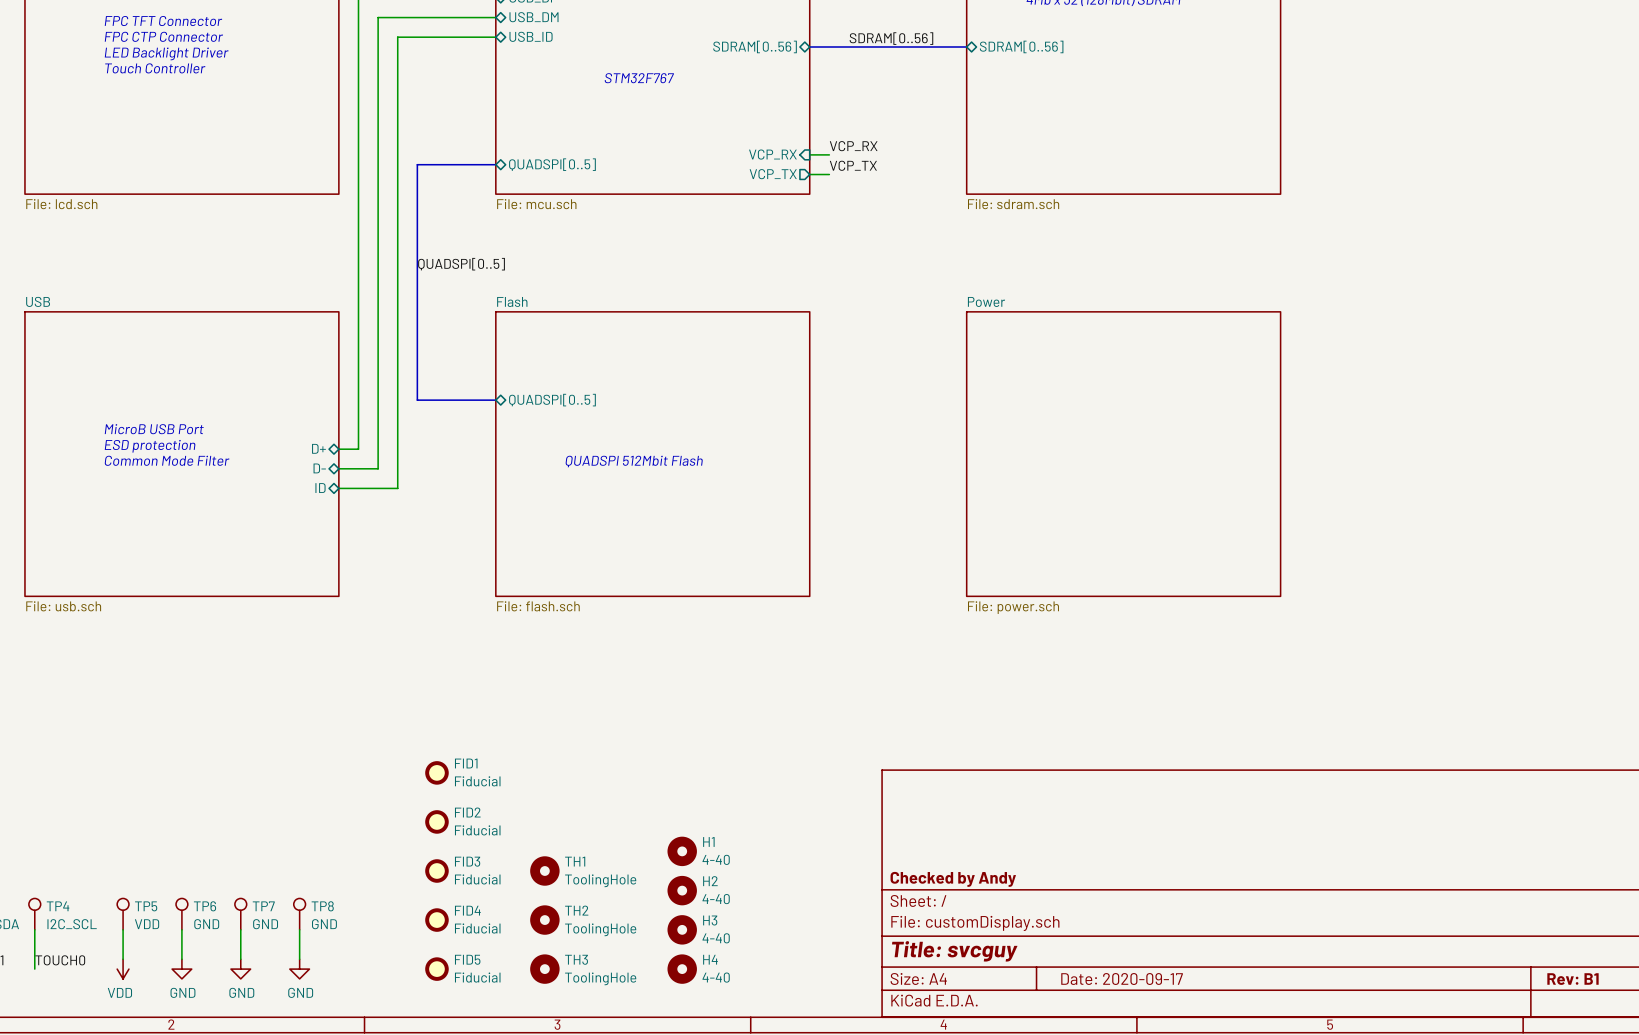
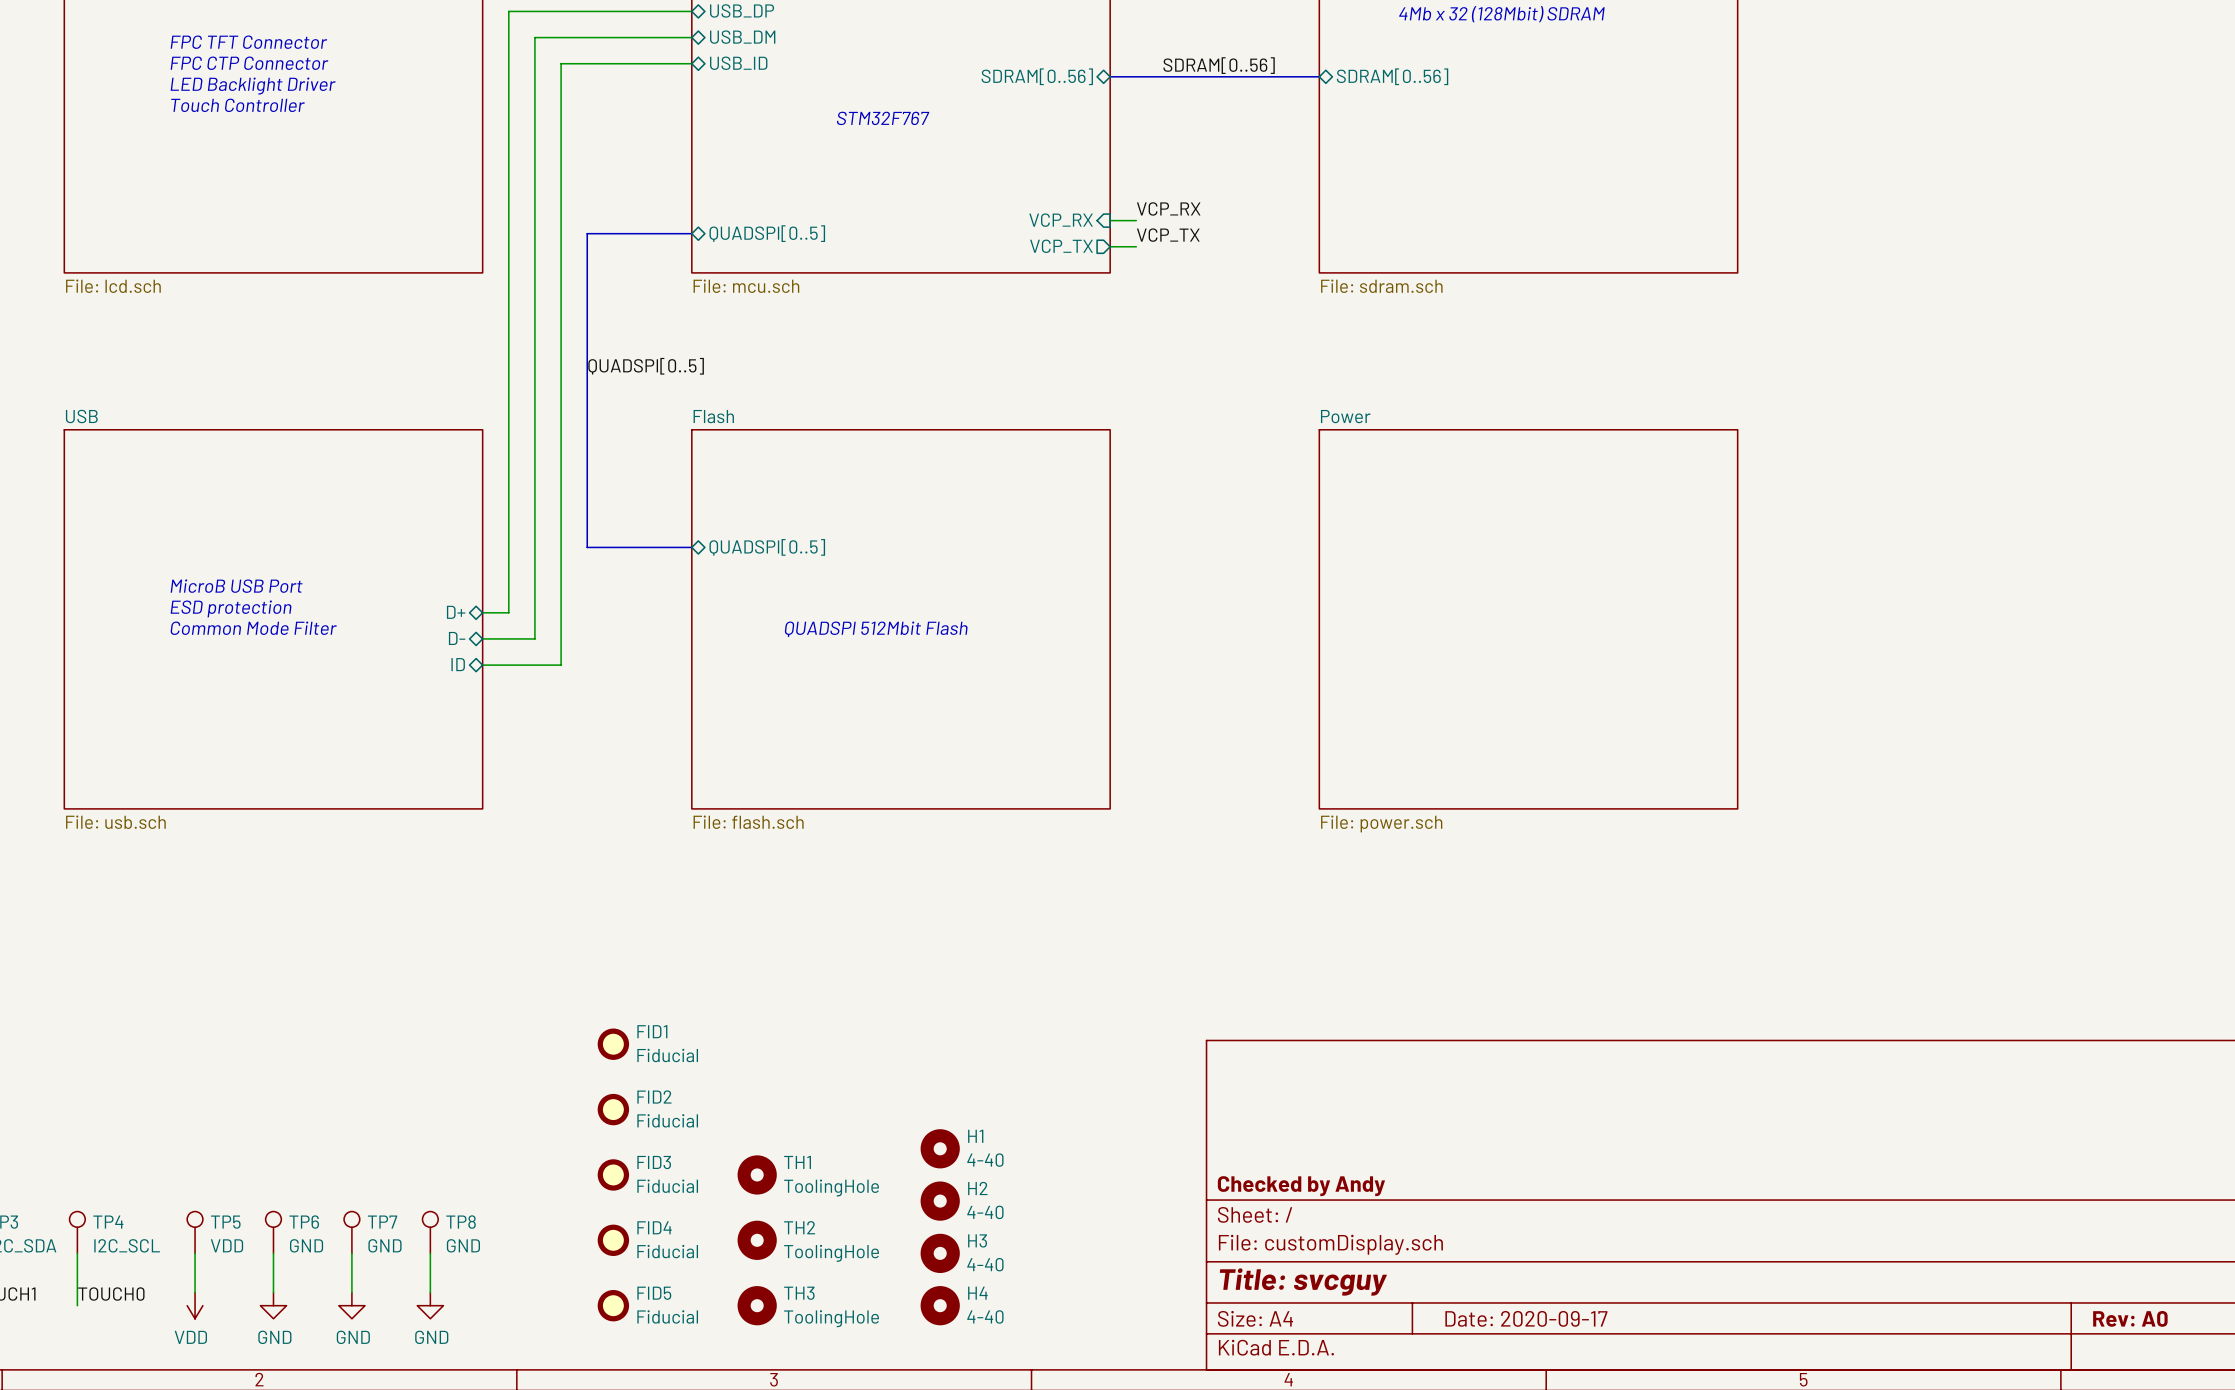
title block: Rev: B1 (1572, 979) -> Rev: A0 (2130, 1318)

